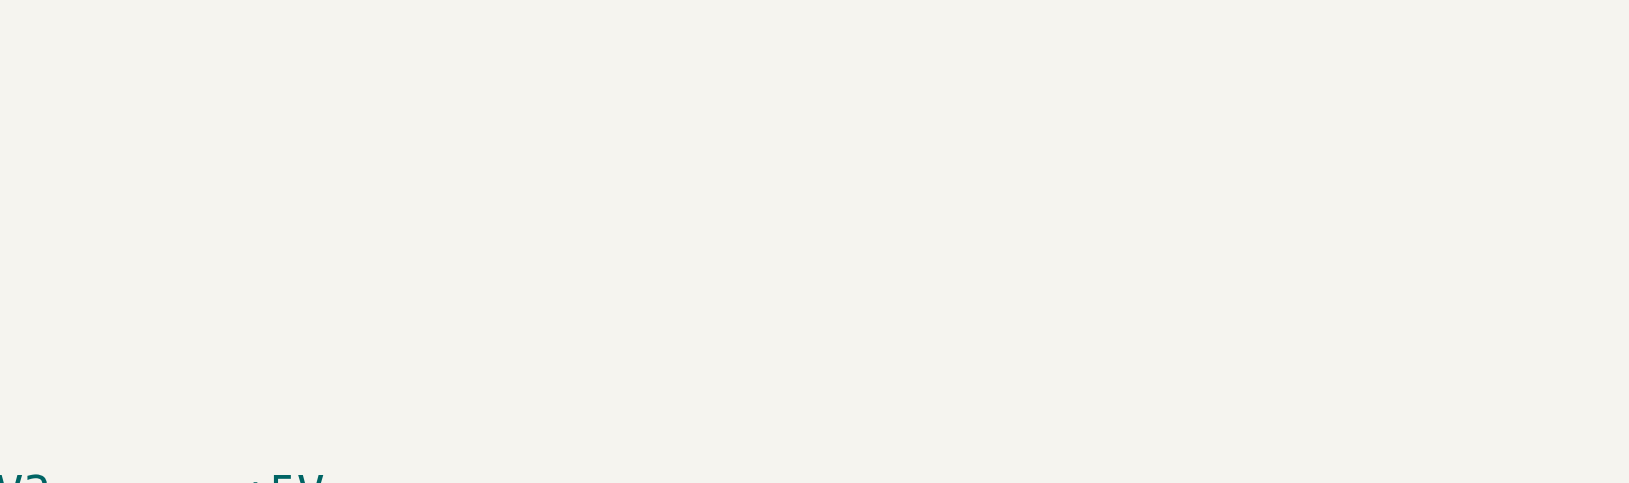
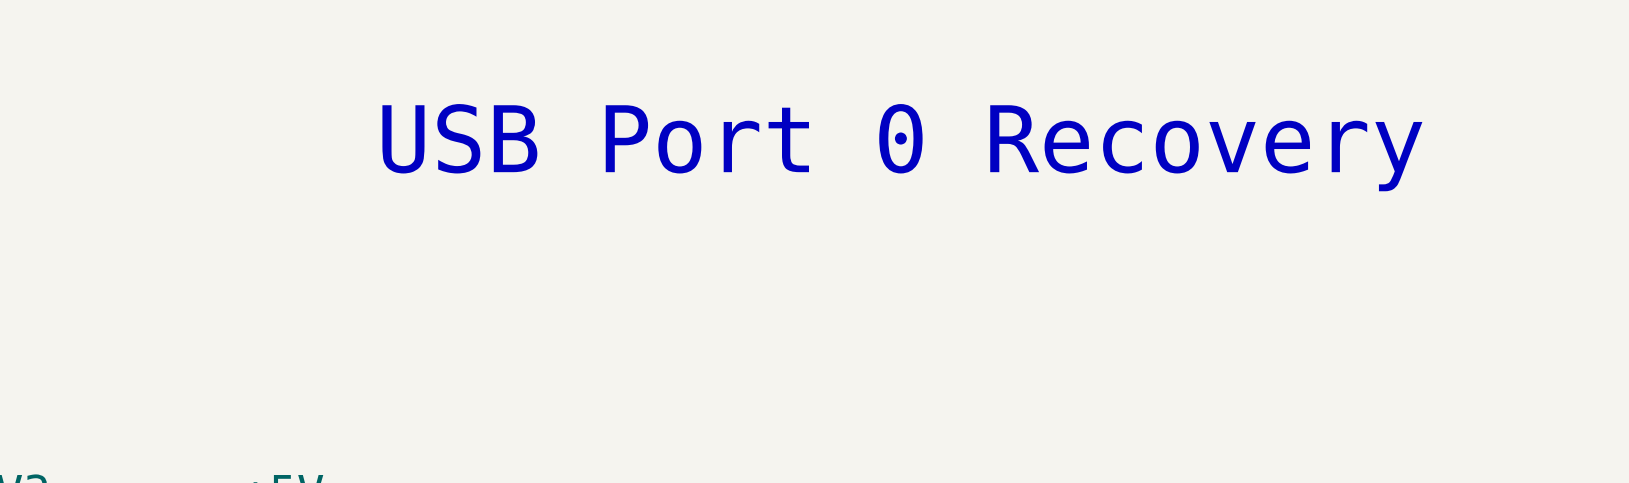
text: none -> USB Port 0 Recovery (902, 147)

